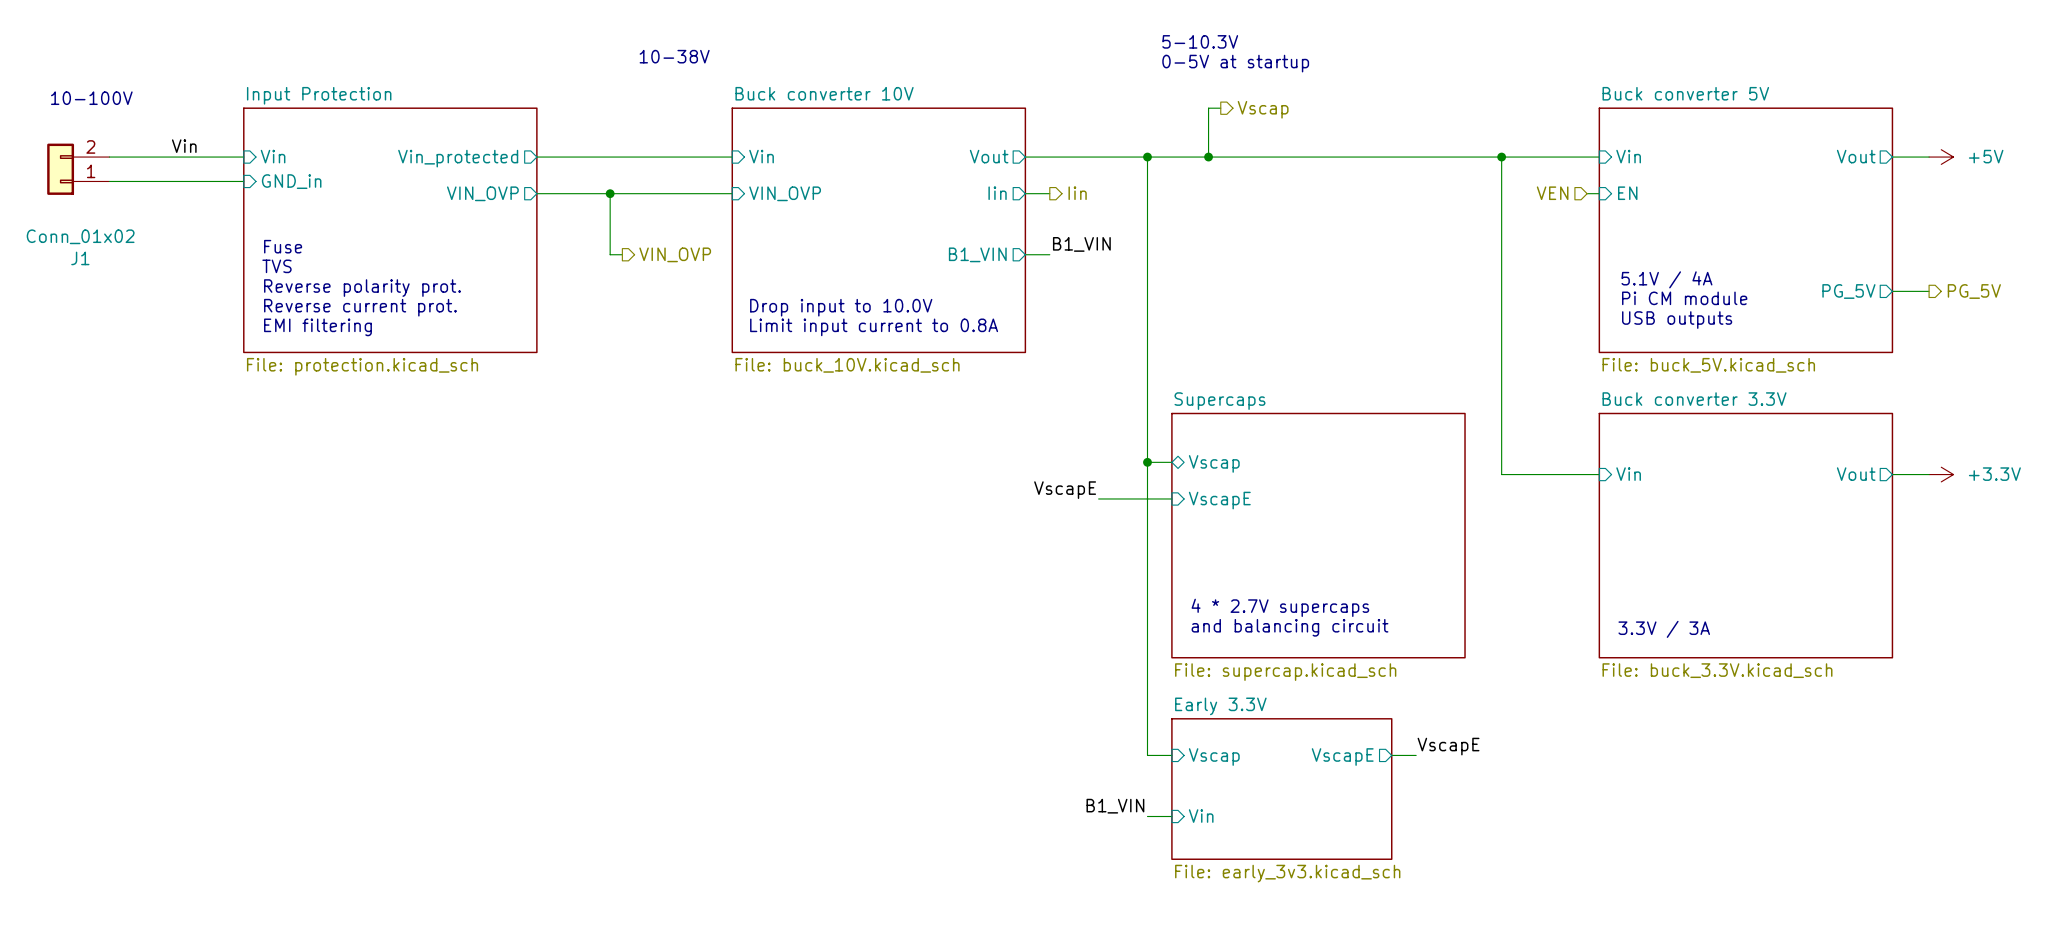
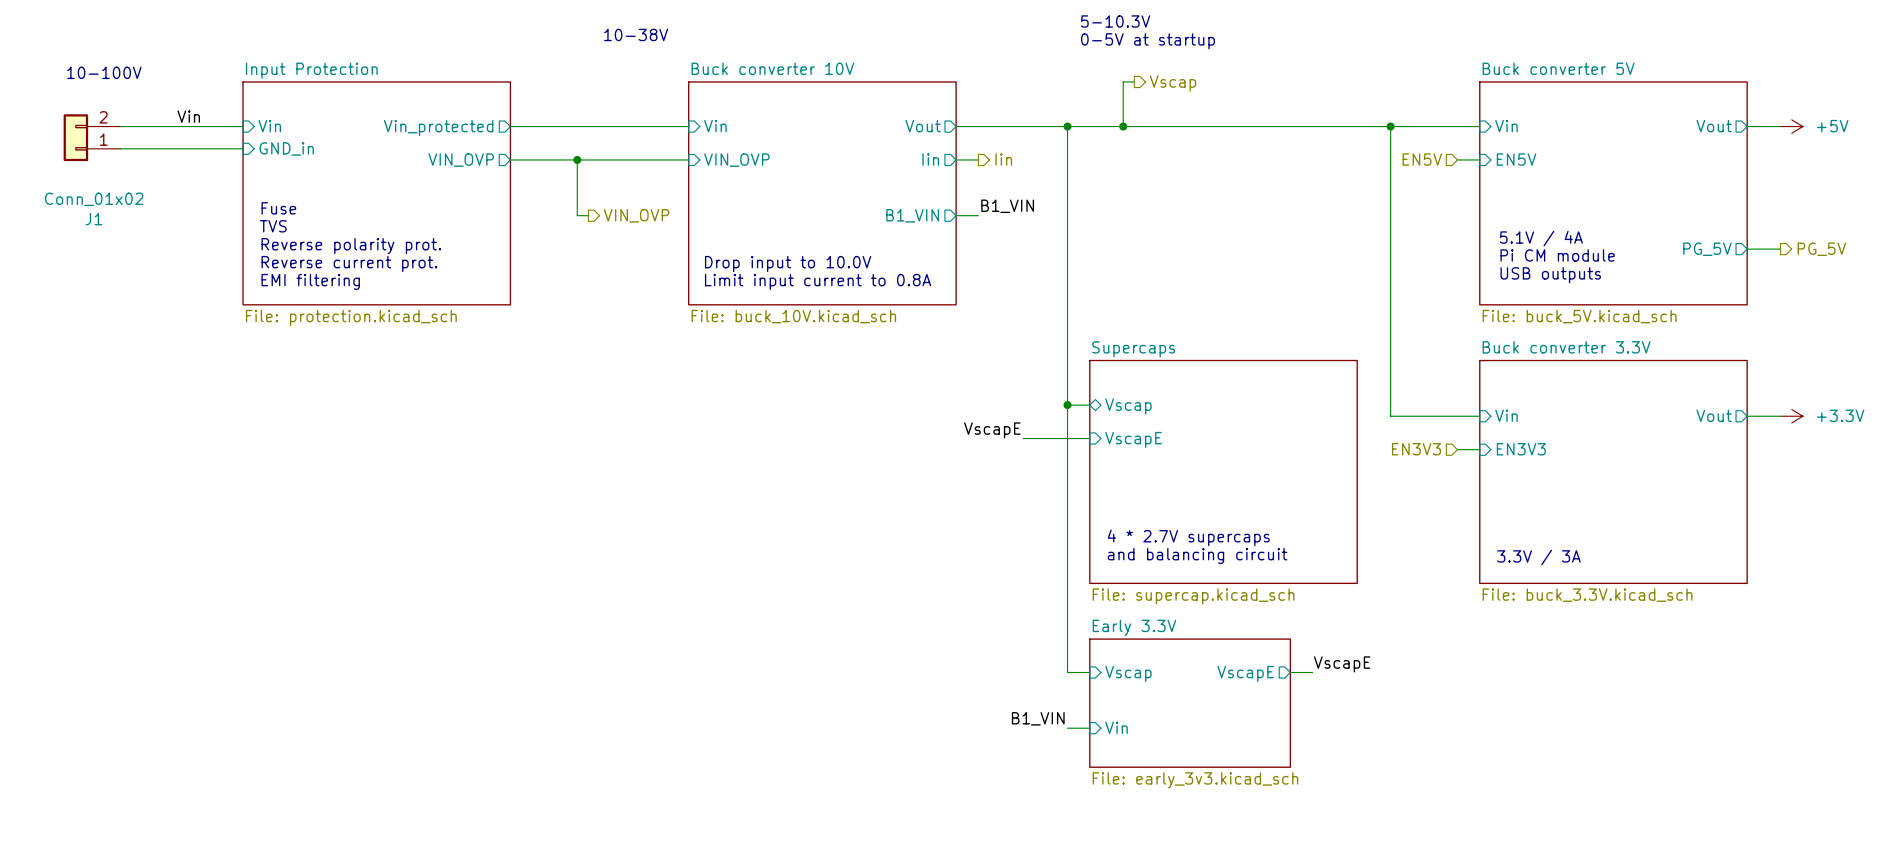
hierarchical label: none -> EN5V (1422, 159)
hierarchical label: VEN (1552, 193) -> none
wire: none -> (1457, 159) (1468, 159)
sheet pin: EN (1627, 193) -> EN5V (1516, 159)
hierarchical label: none -> EN3V3 (1416, 449)
sheet pin: none -> EN3V3 (1521, 449)
wire: none -> (1457, 449) (1479, 449)

